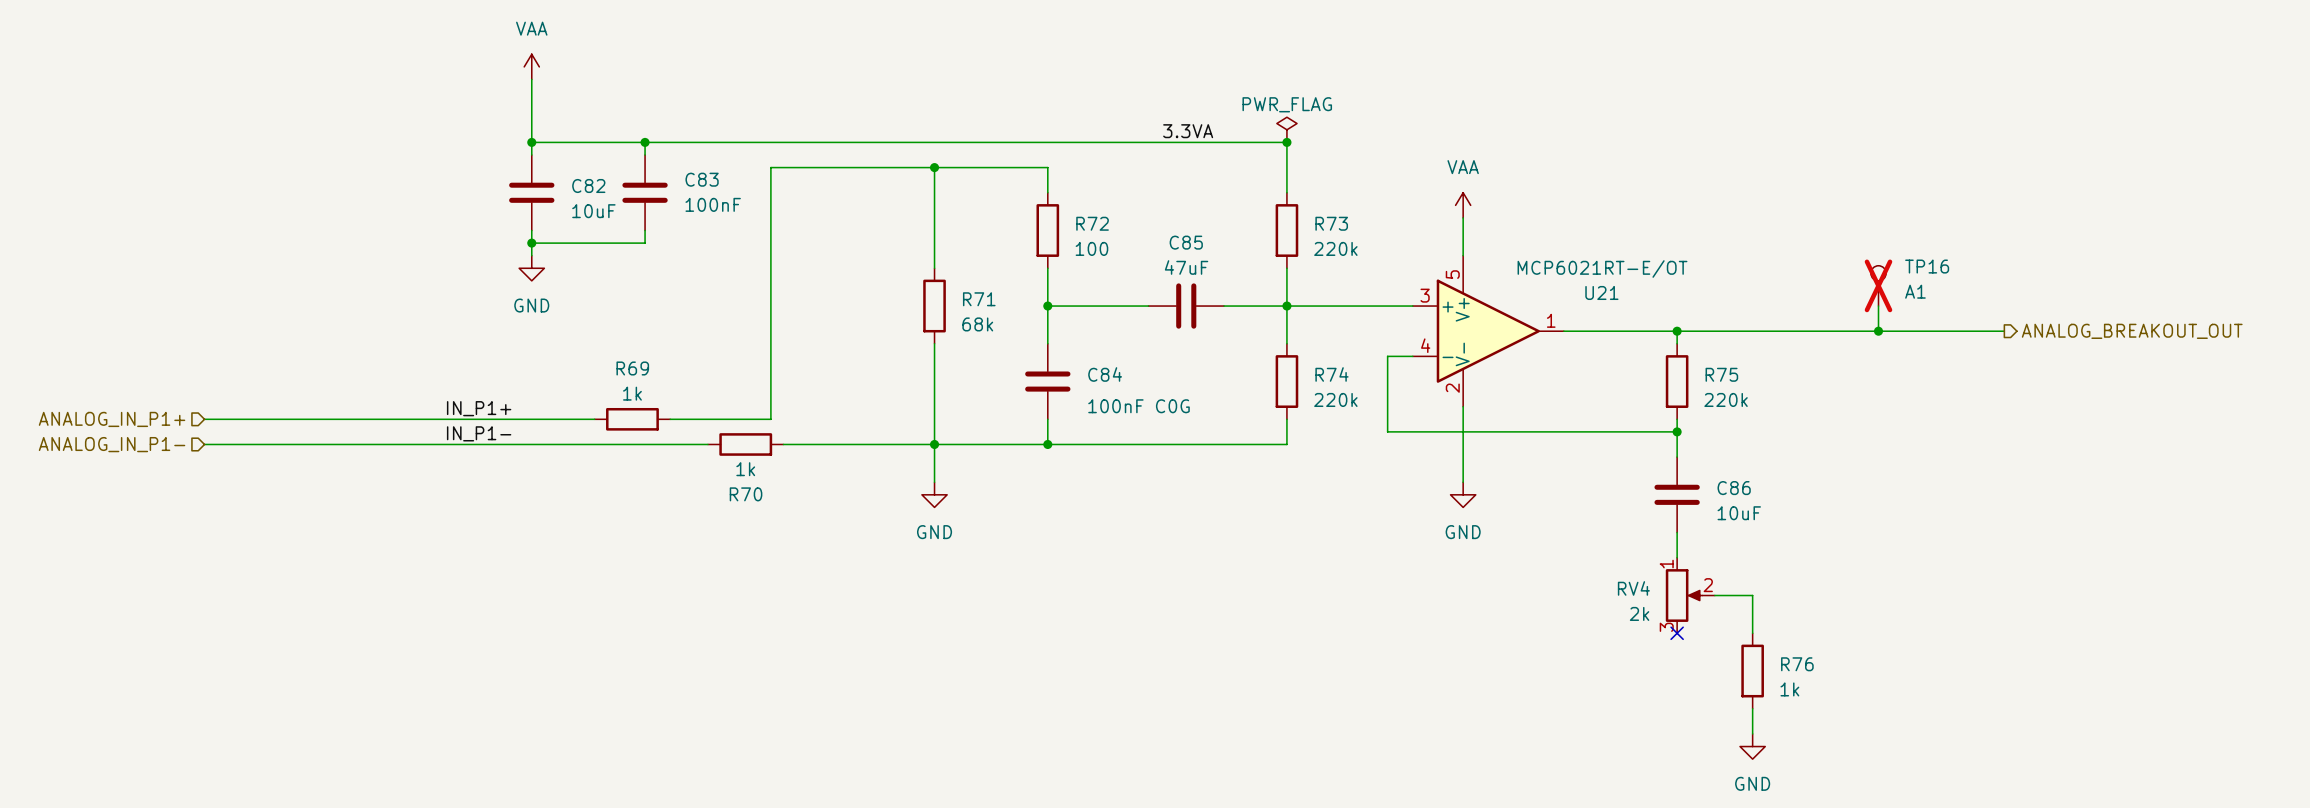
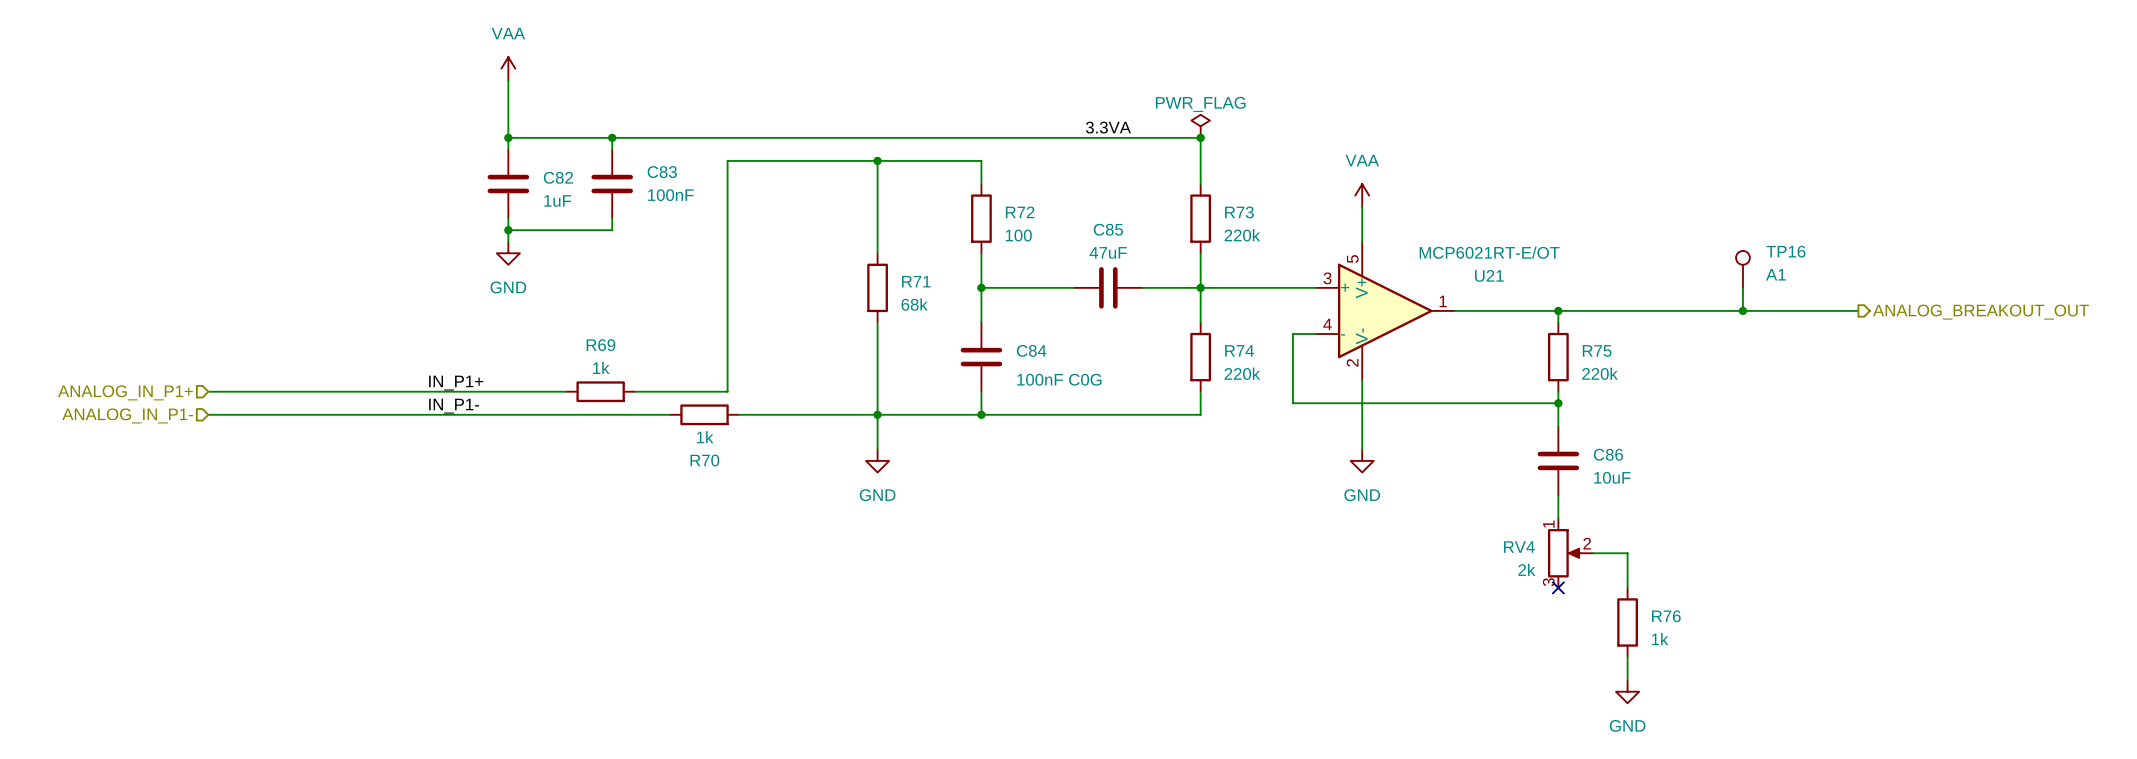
C82 value: 10uF (593, 211) -> 1uF (557, 200)
TP16 do-not-place cross: (1878, 285) -> none

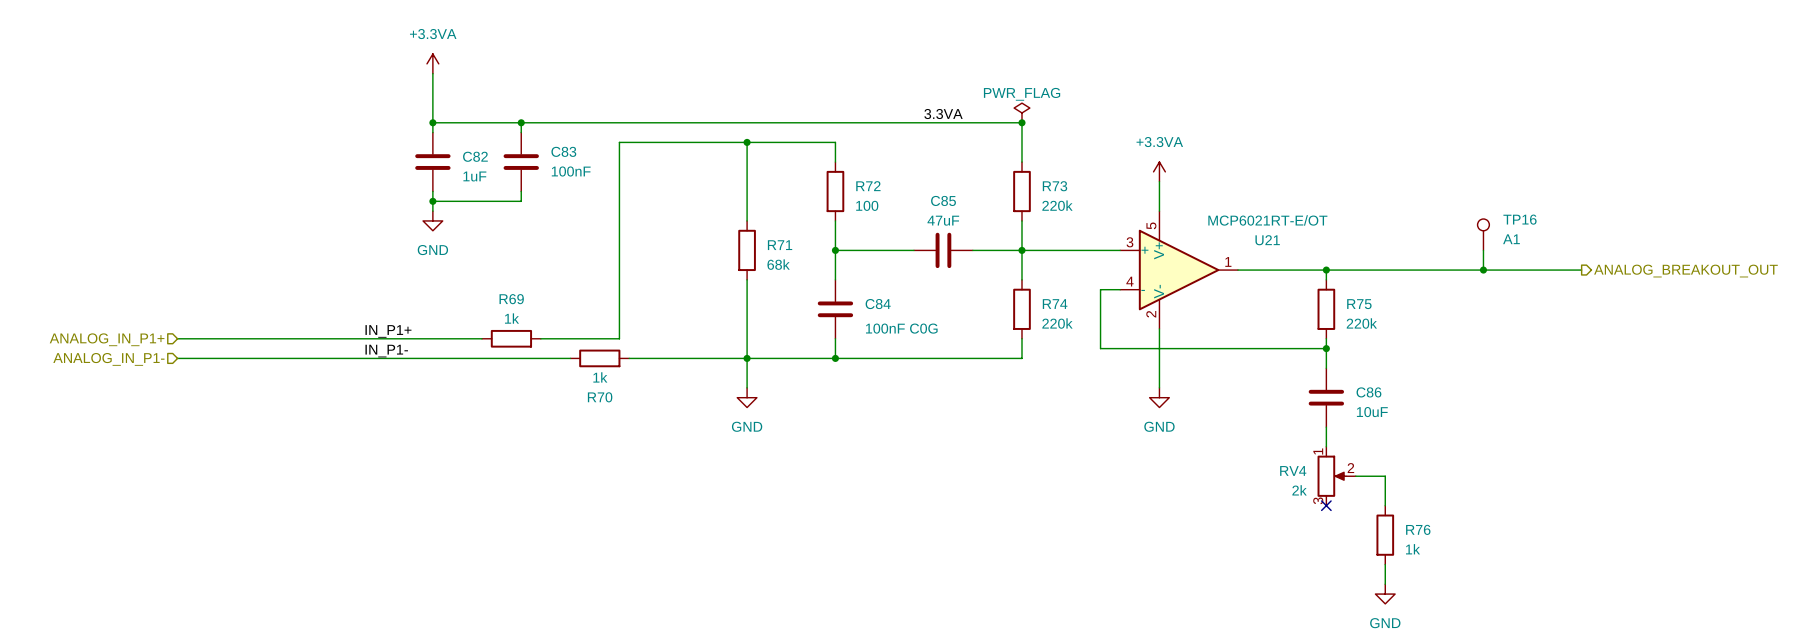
power symbol: VAA (508, 68) -> +3.3VA (432, 63)
power symbol: VAA (1362, 195) -> +3.3VA (1159, 171)

